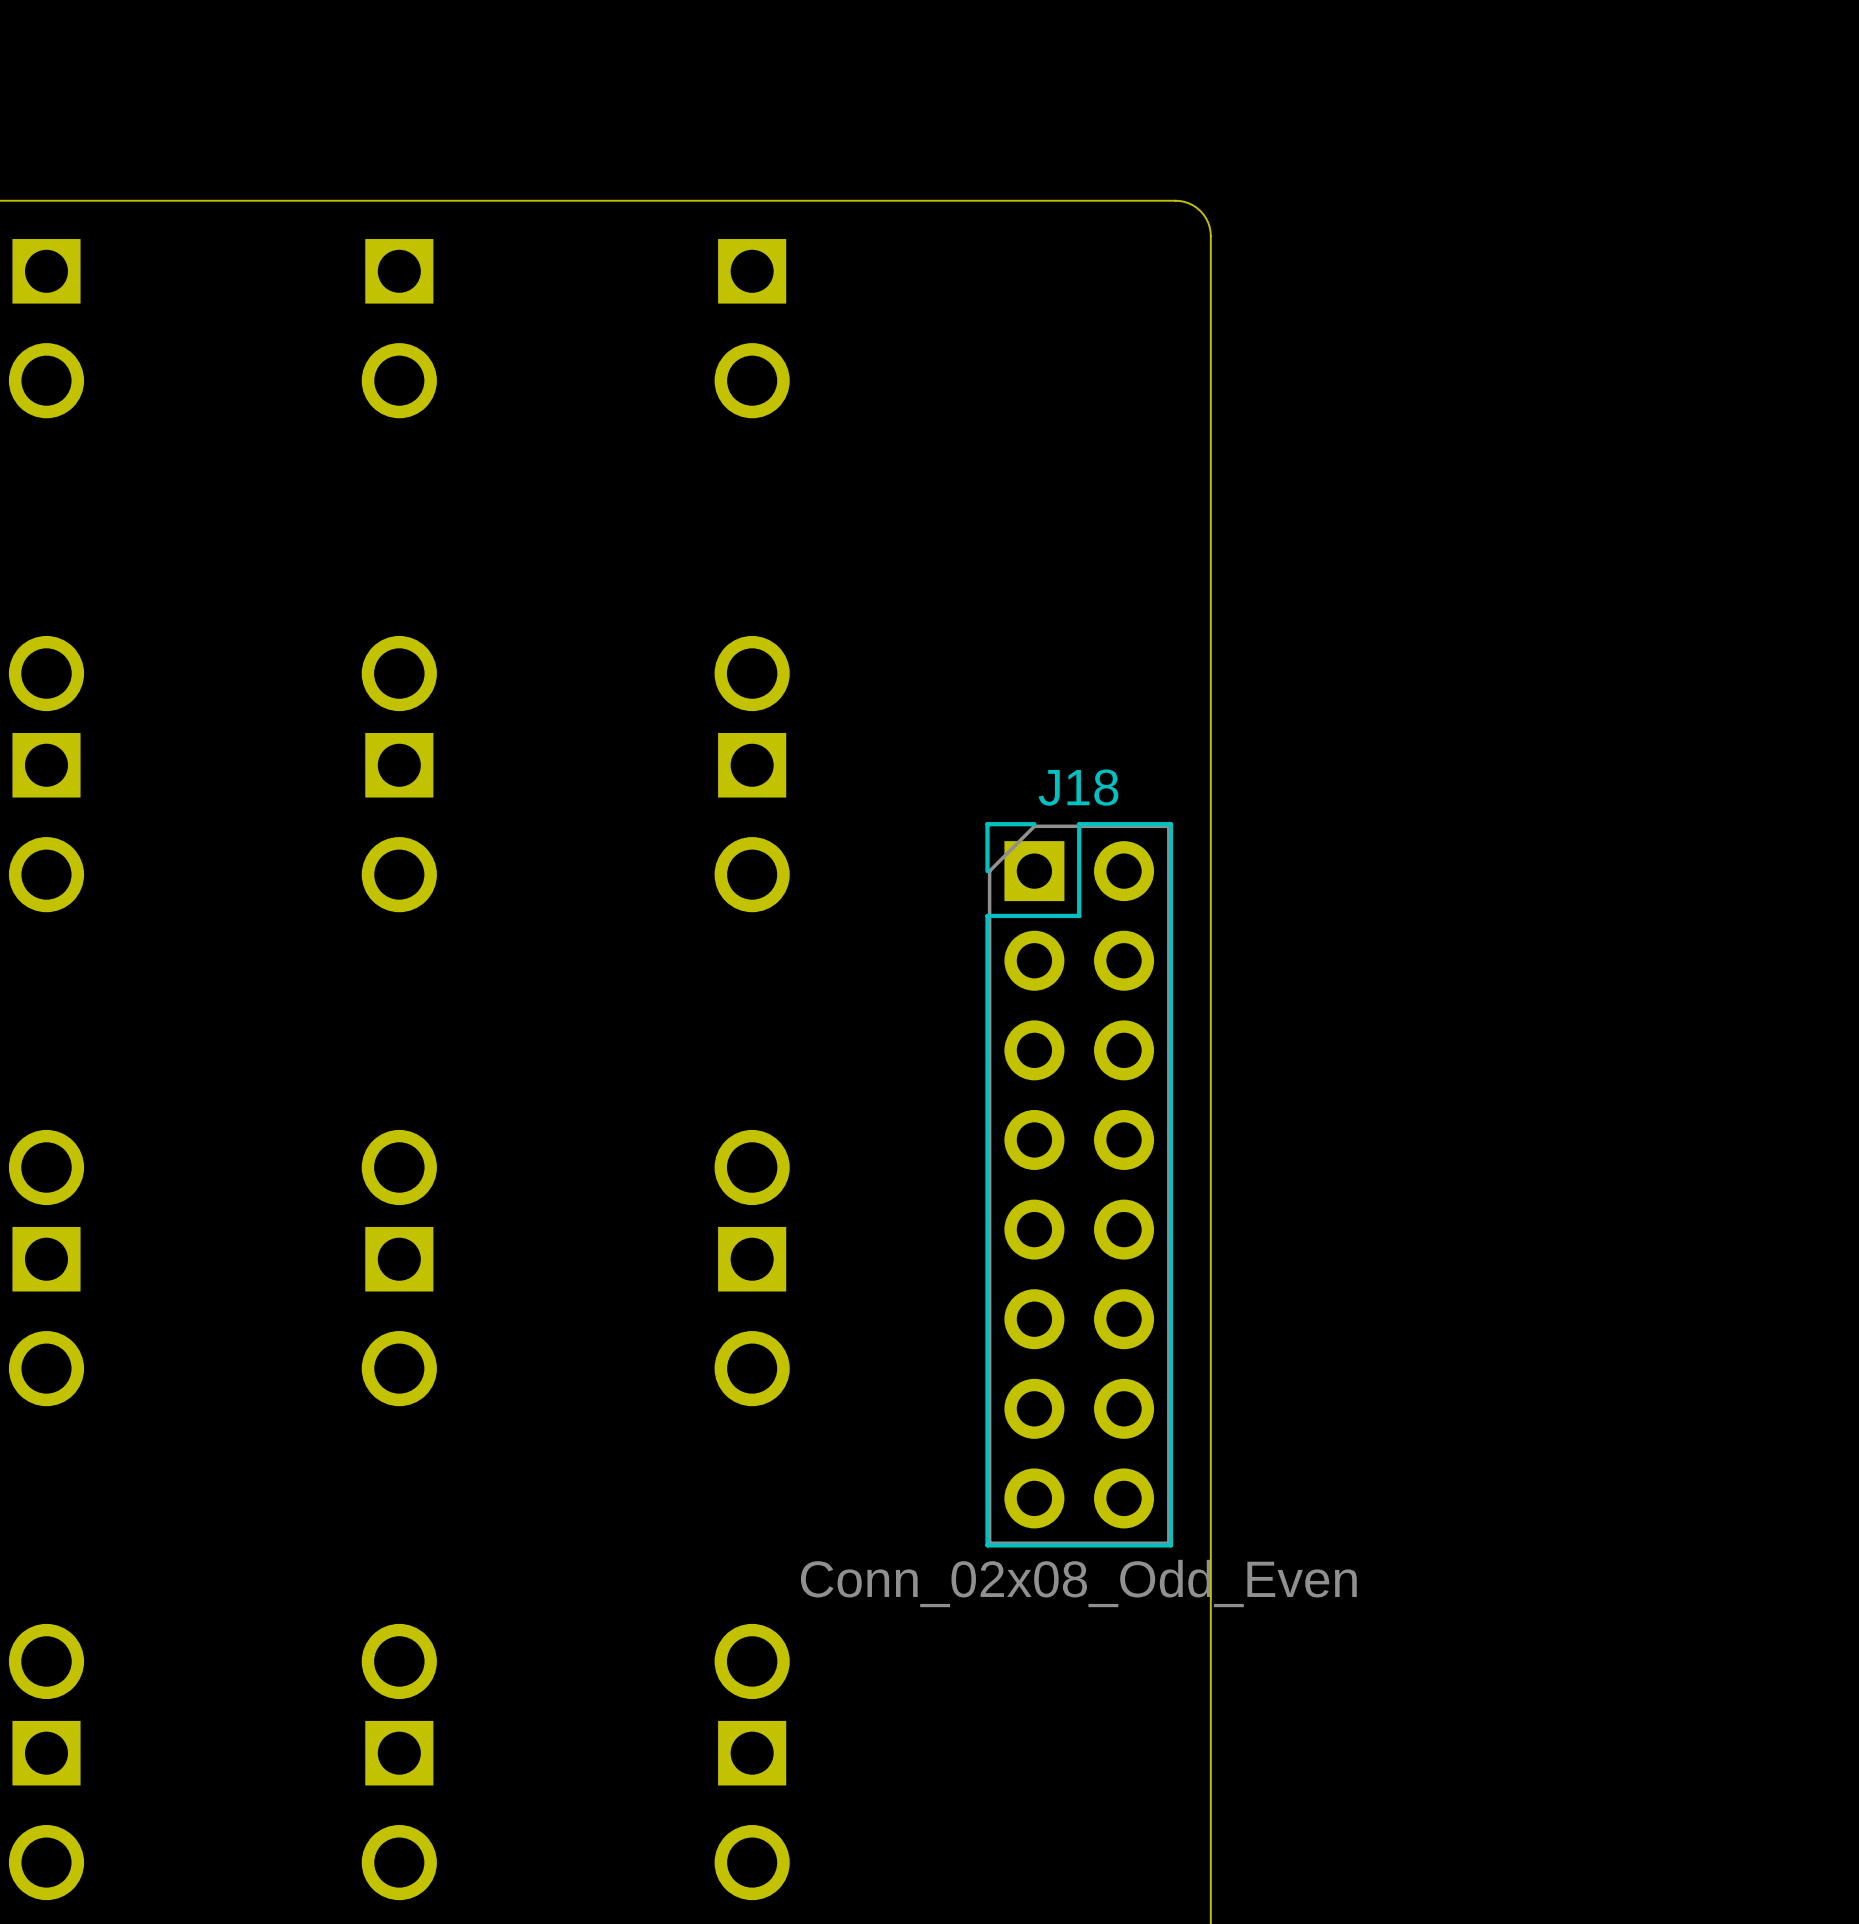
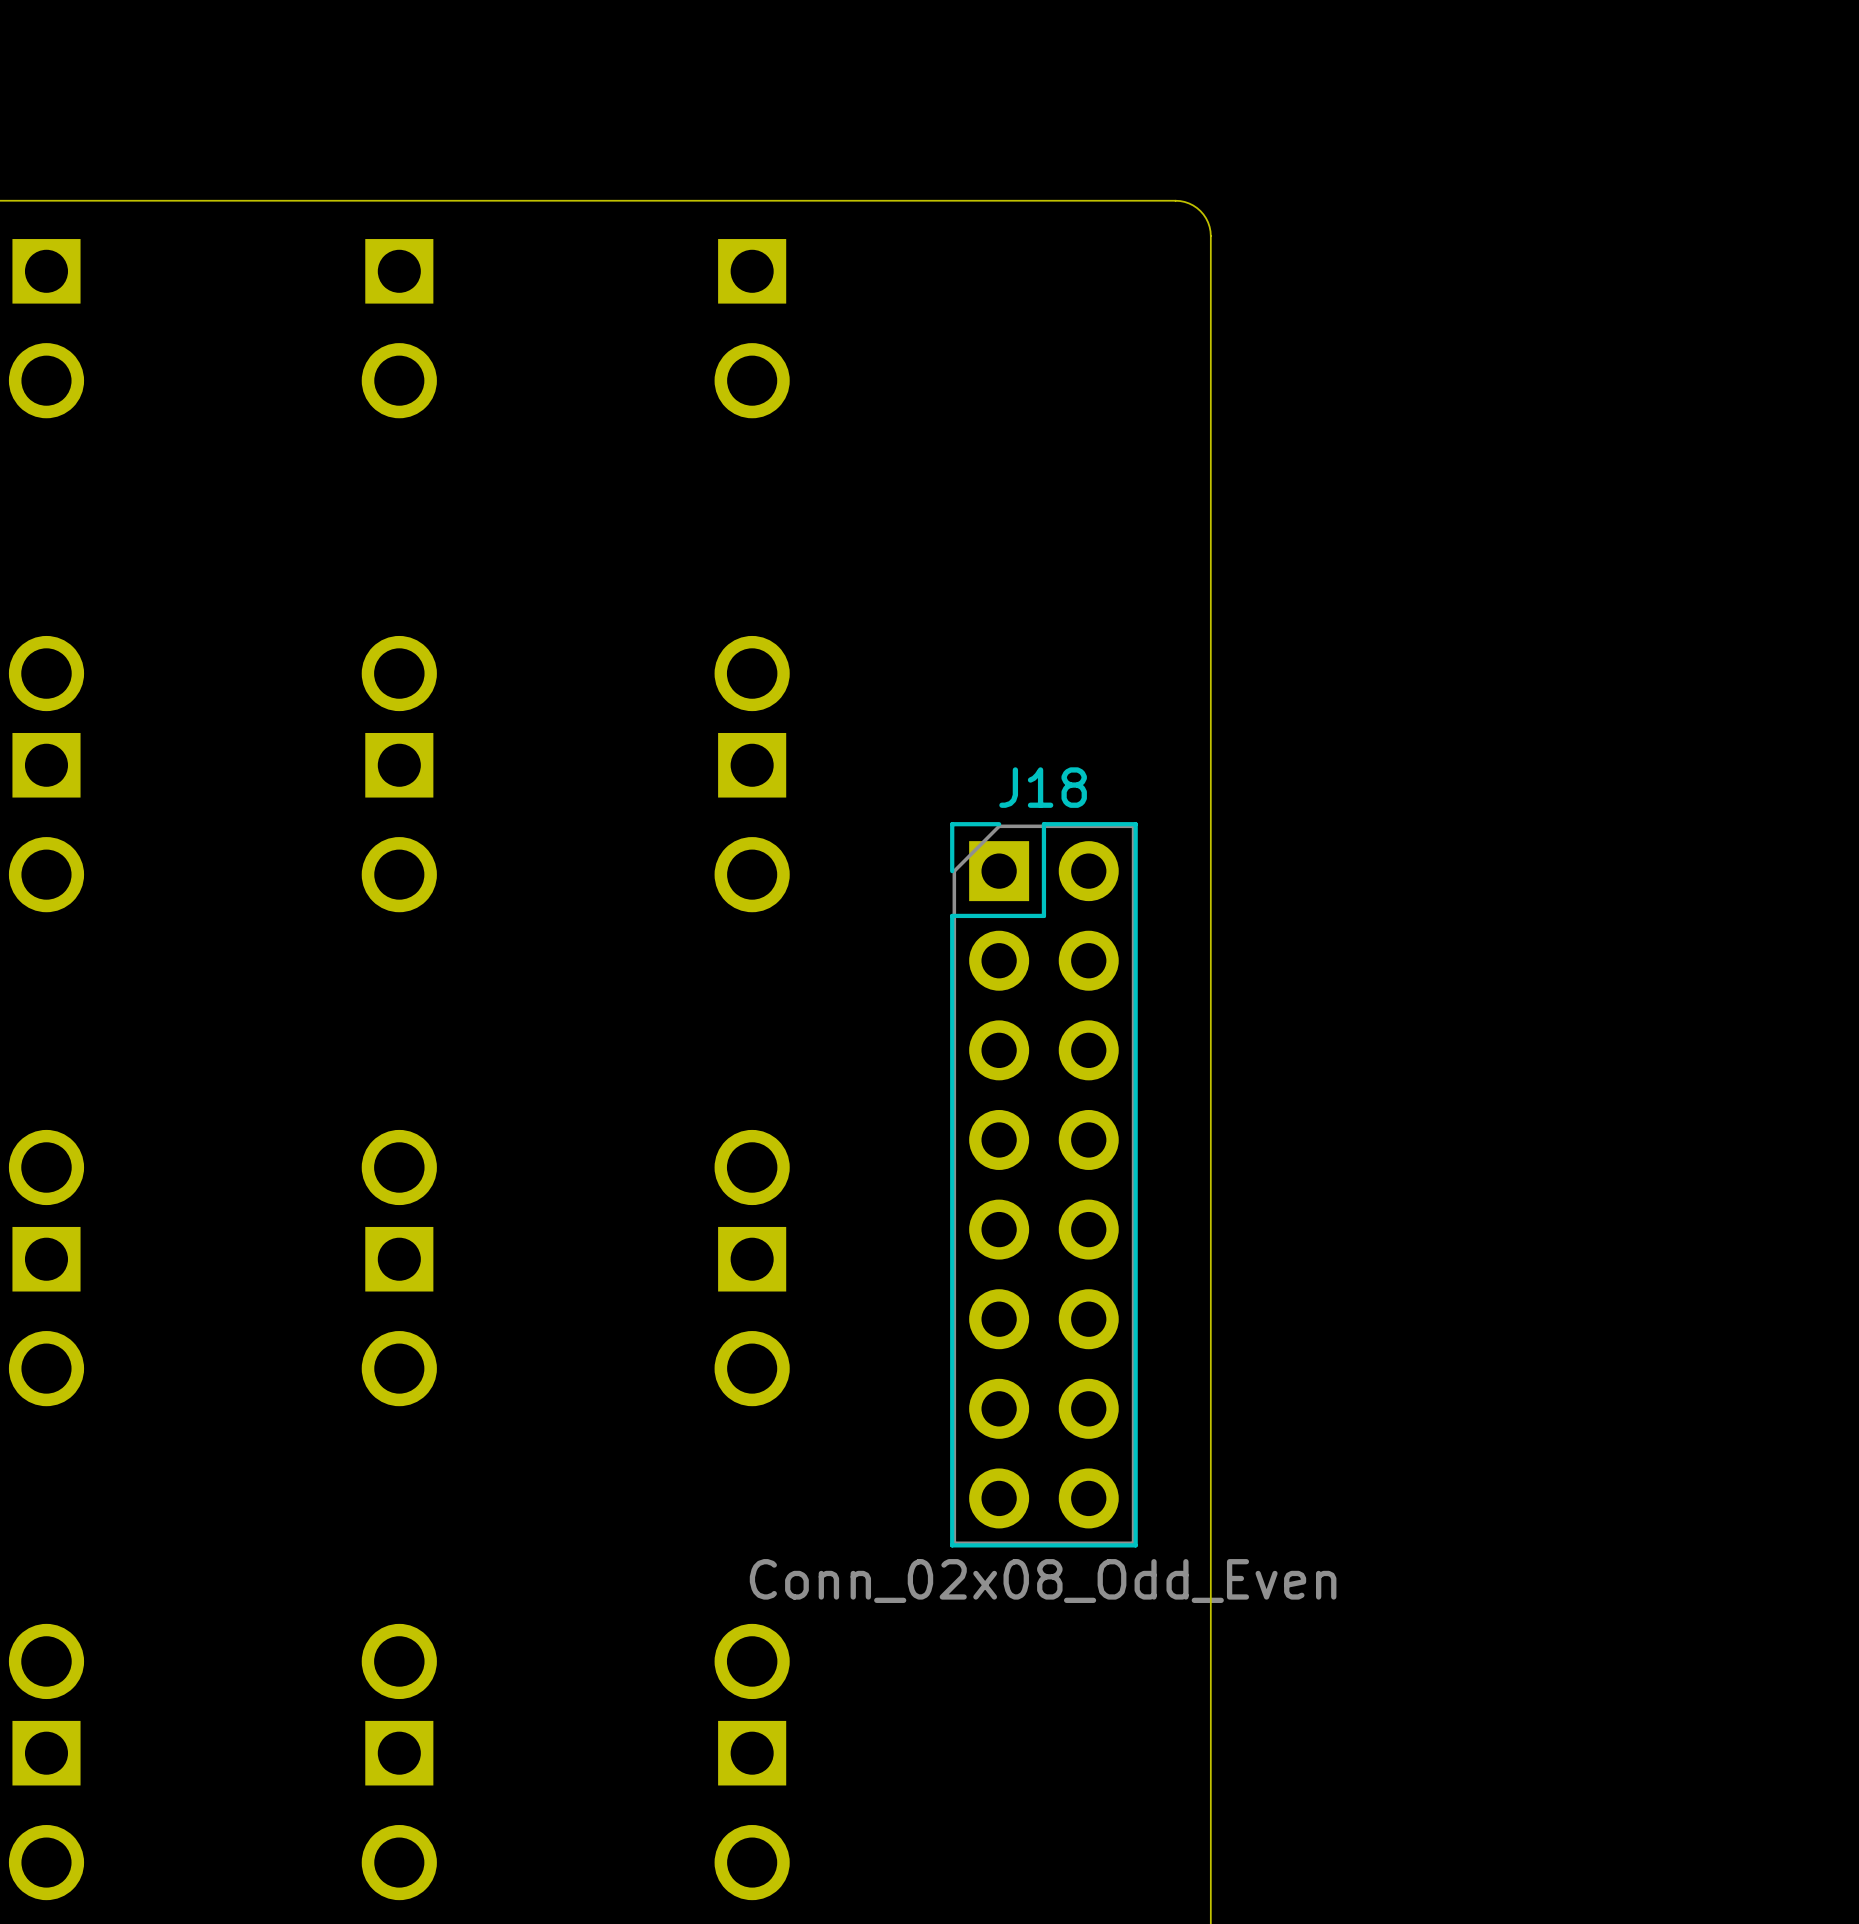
J18 position: (1079, 1184) -> (1043, 1184)

